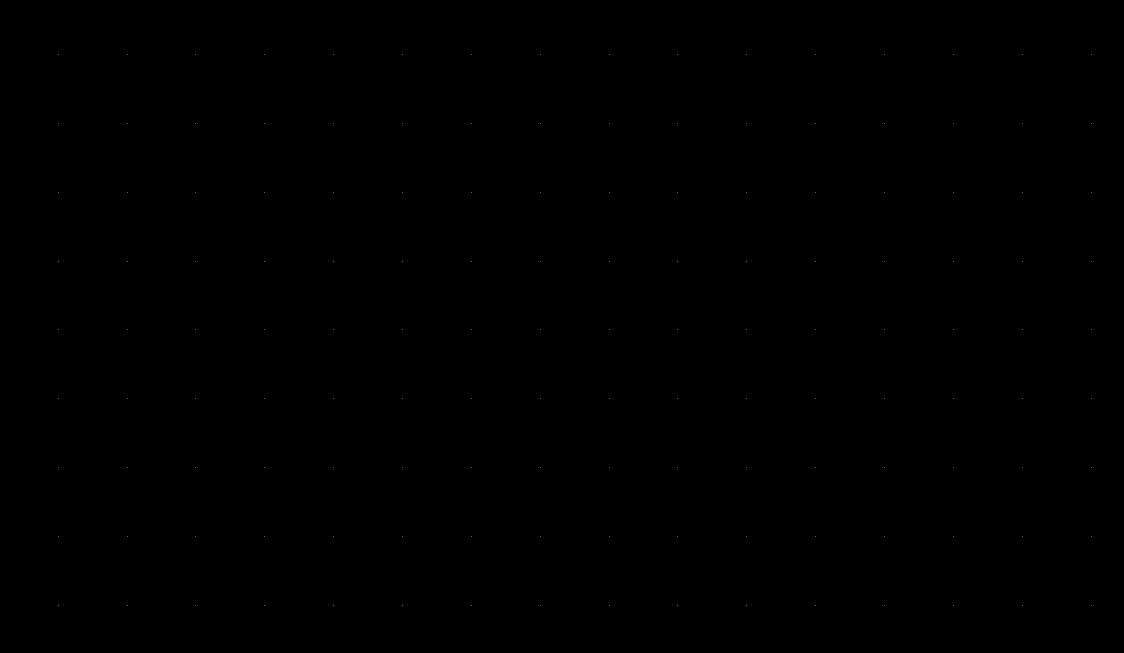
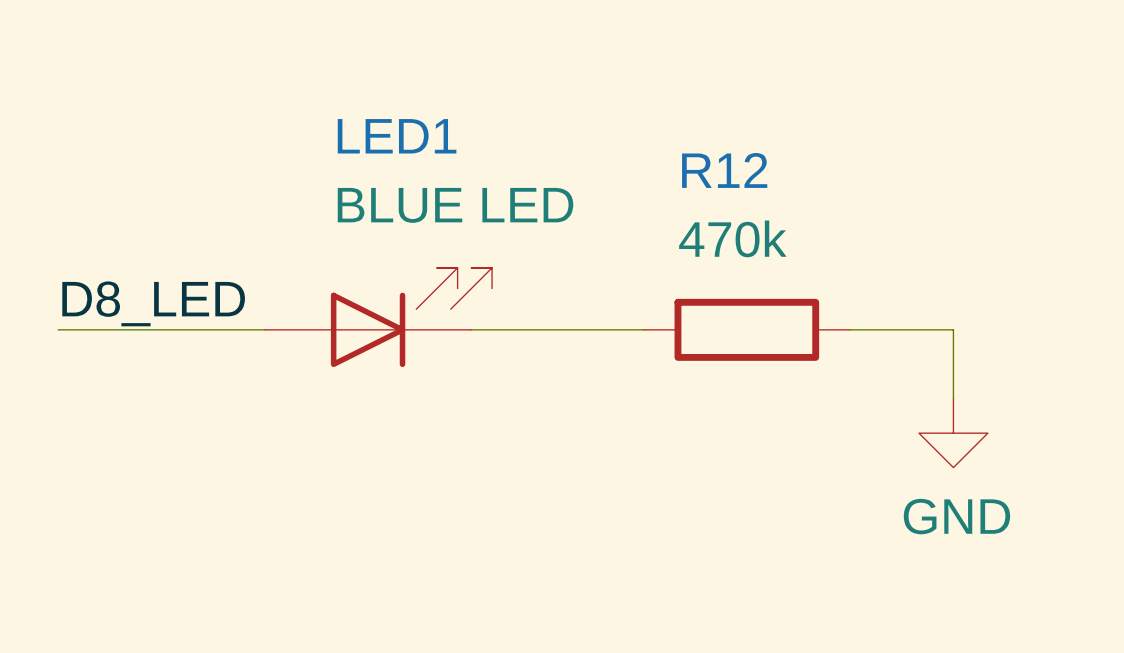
label: none -> D8_LED (153, 303)
LED1: none -> BLUE LED (378, 317)
wire: none -> (58, 329) (264, 329)
wire: none -> (471, 329) (643, 329)
R12: none -> 470k (746, 329)
wire: none -> (850, 329) (953, 329) (953, 398)
power symbol: none -> GND (953, 433)

